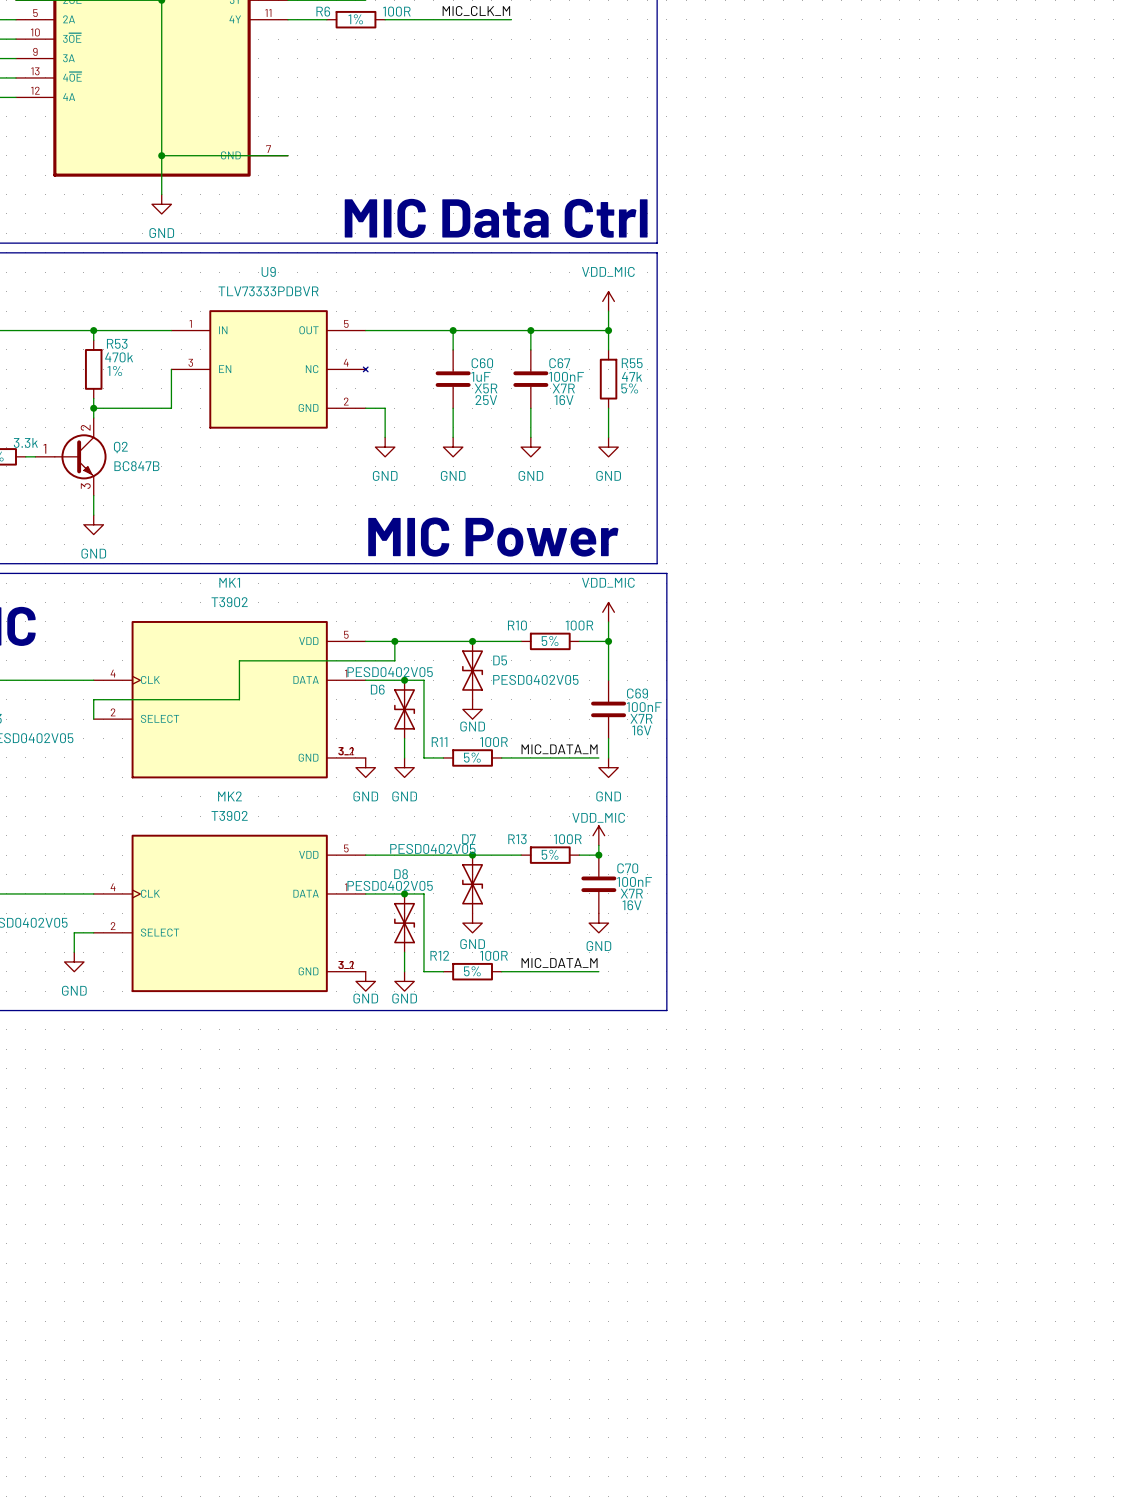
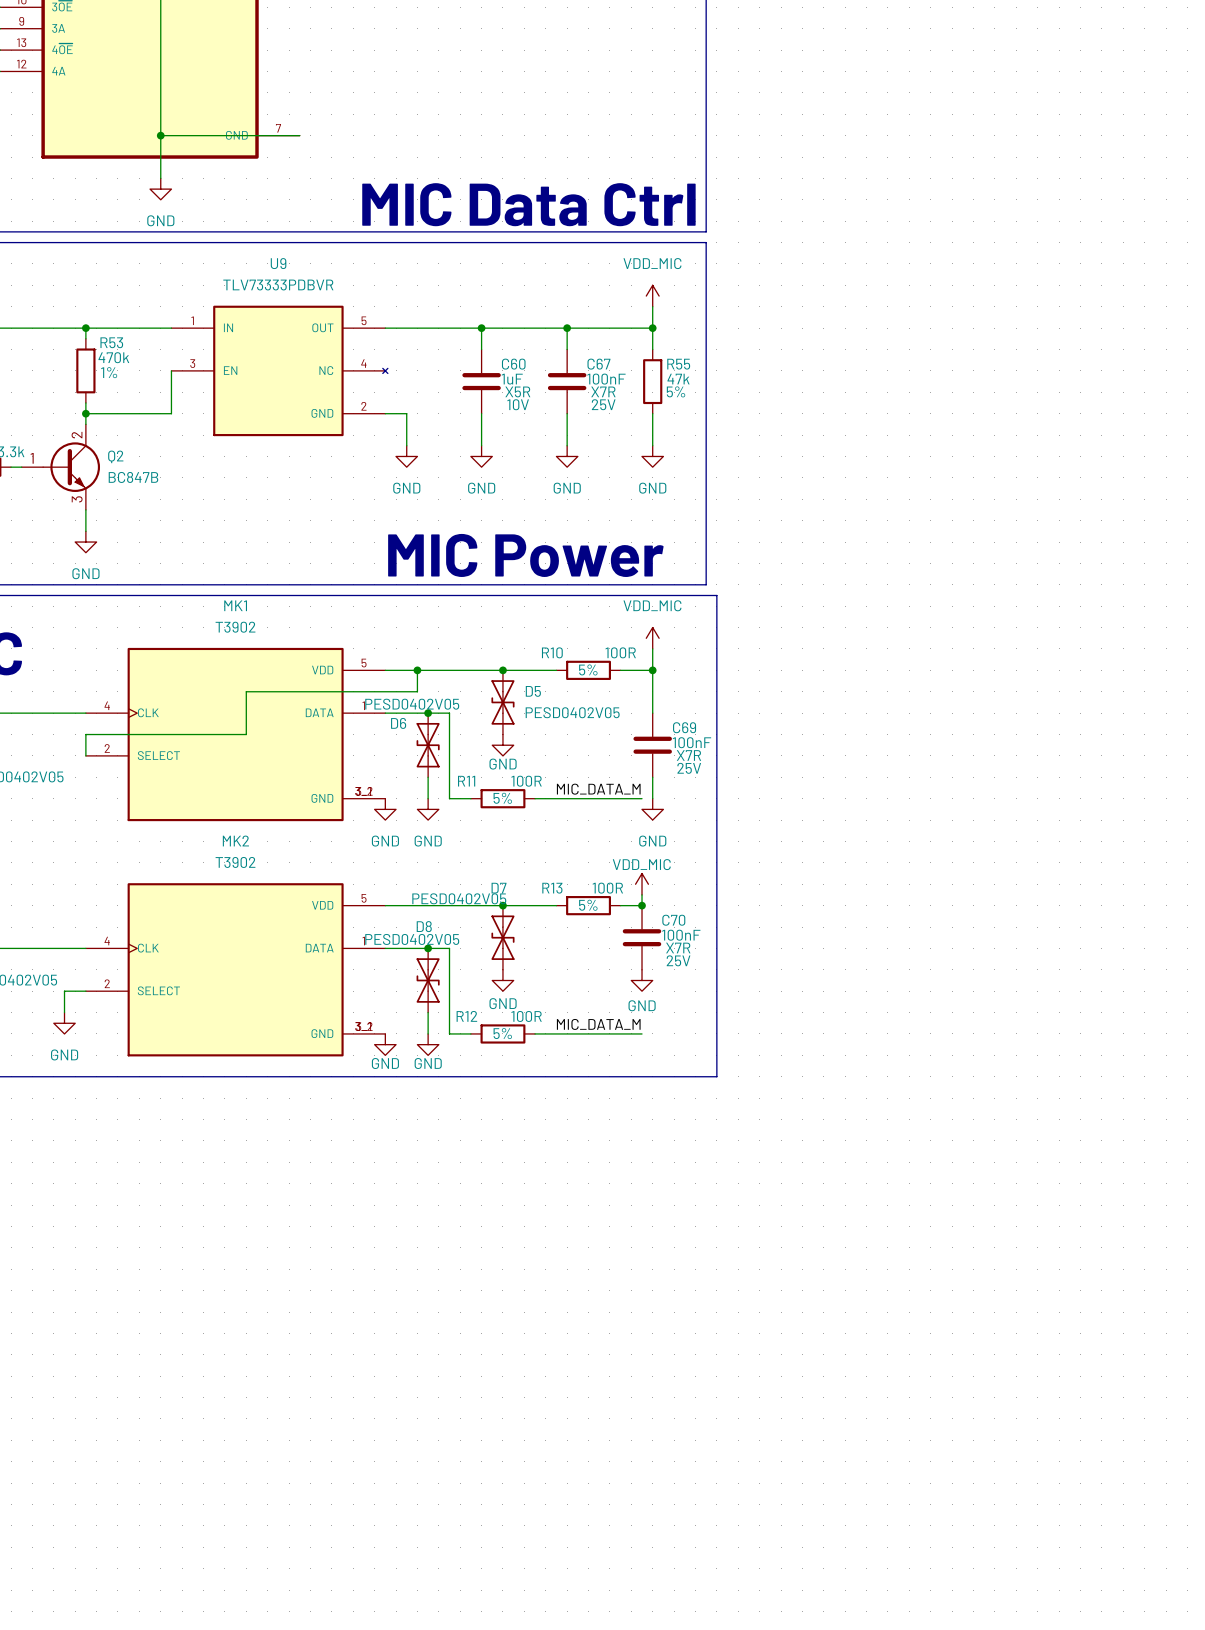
C60 text: 25V (486, 400) -> 10V (518, 404)
C67 text: 16V (564, 400) -> 25V (603, 404)
C69 text: 16V (641, 730) -> 25V (689, 768)
C70 text: 16V (632, 905) -> 25V (678, 960)

